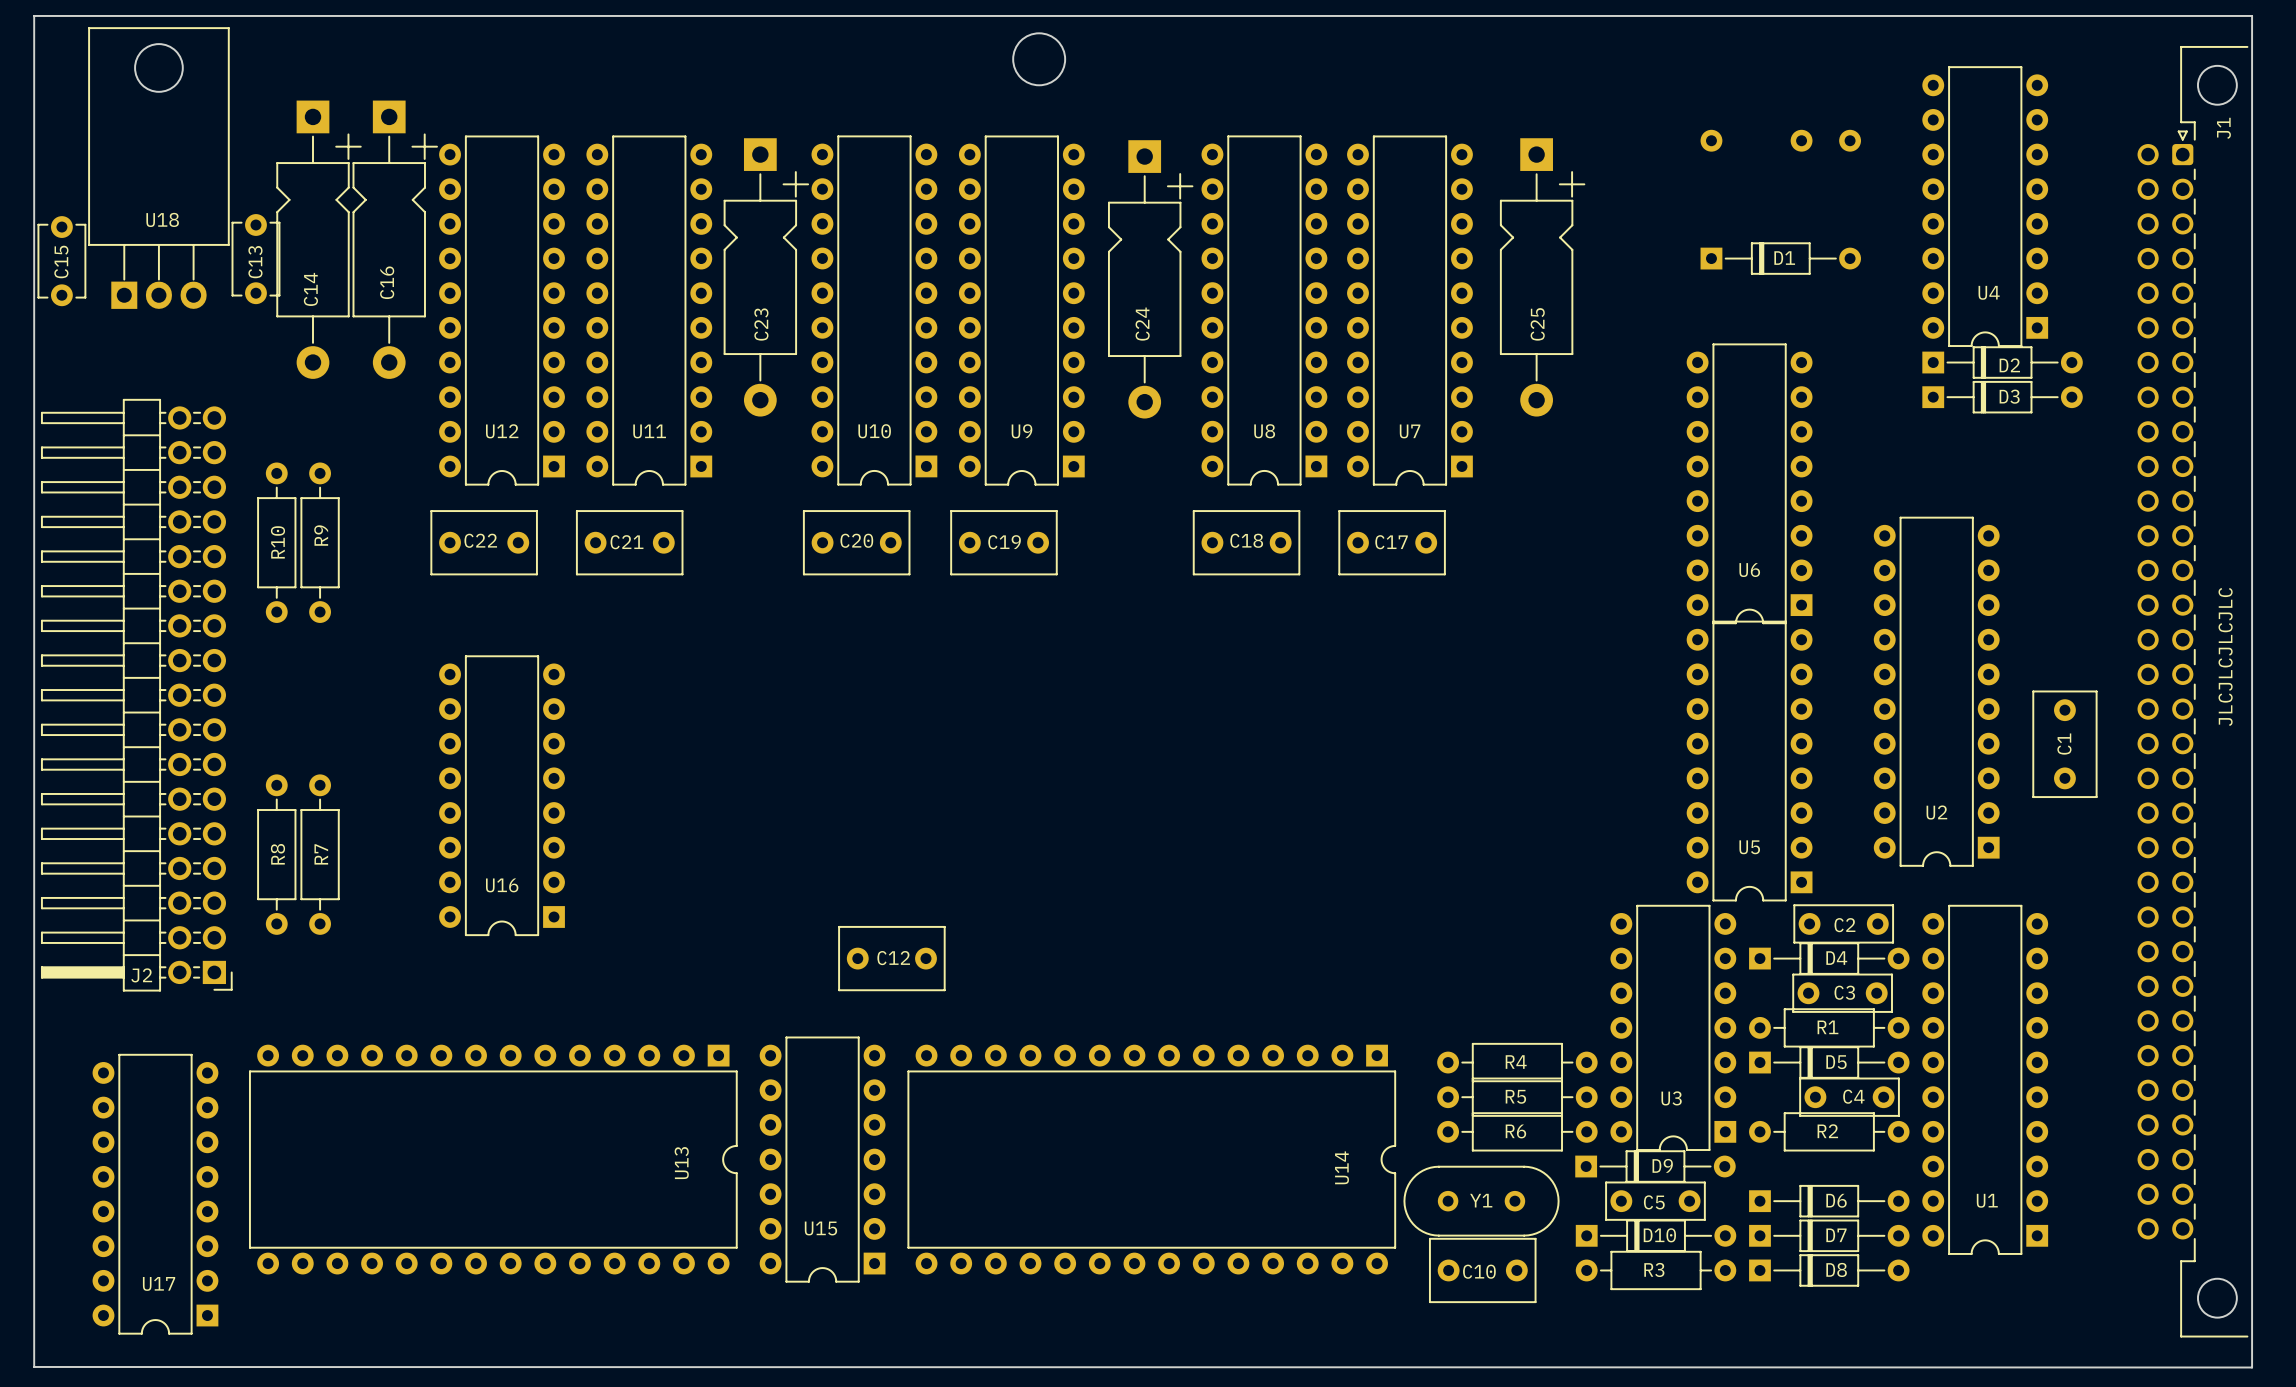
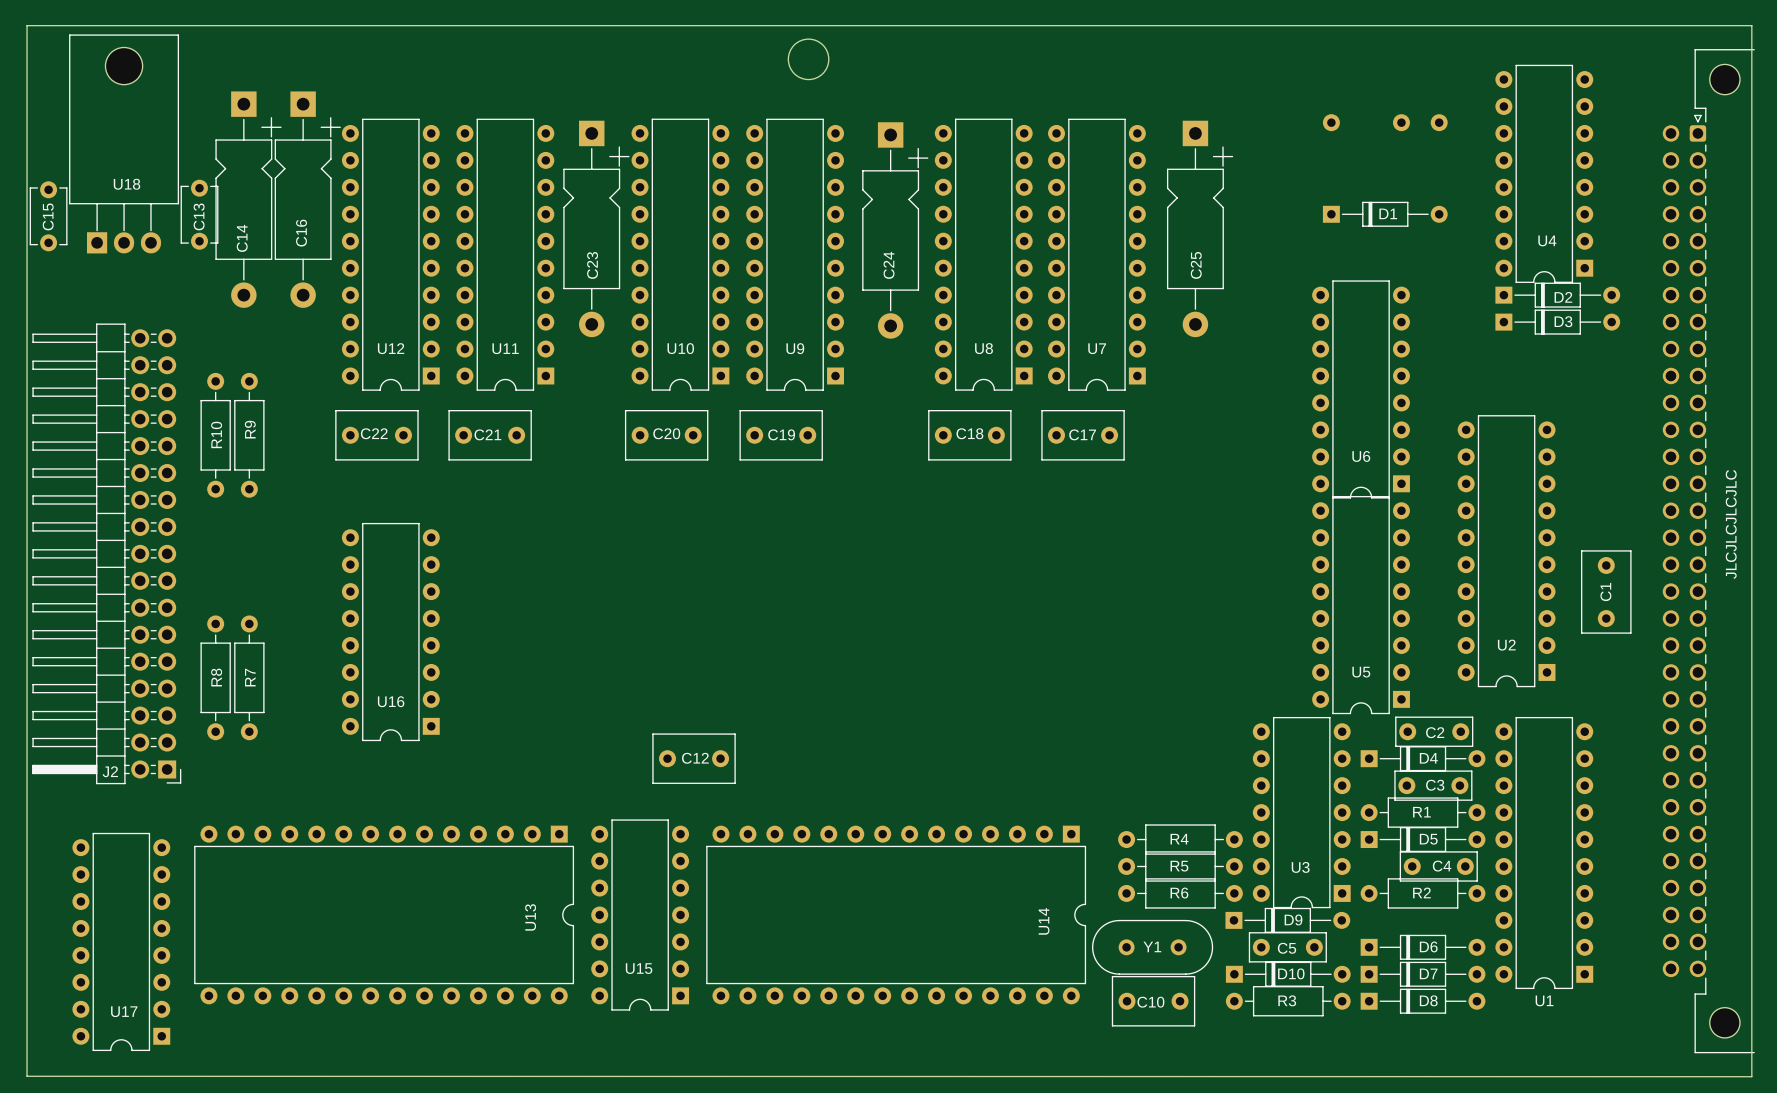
J1: (2192, 691) -> none
part: none -> (1708, 551)
U1 name position: U1 (1987, 1200) -> U1 (1544, 1000)

